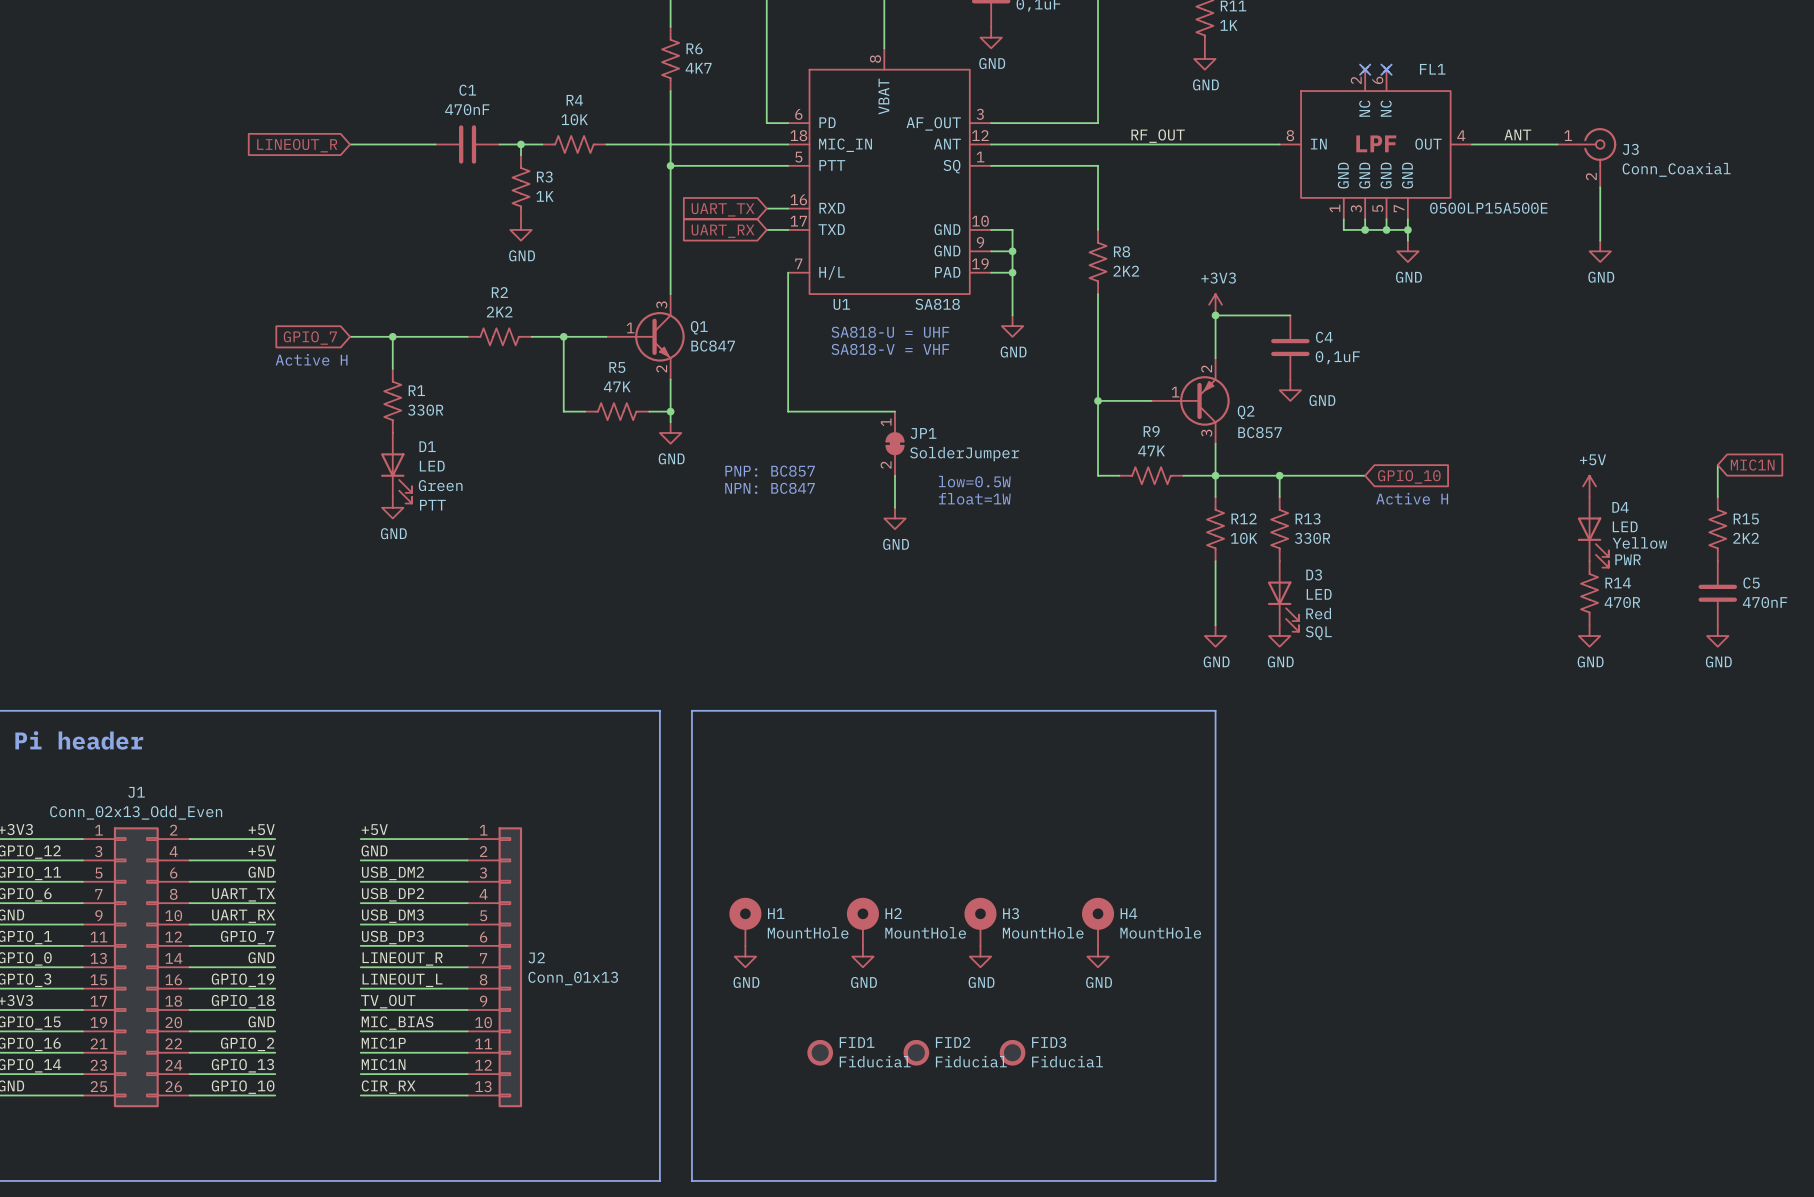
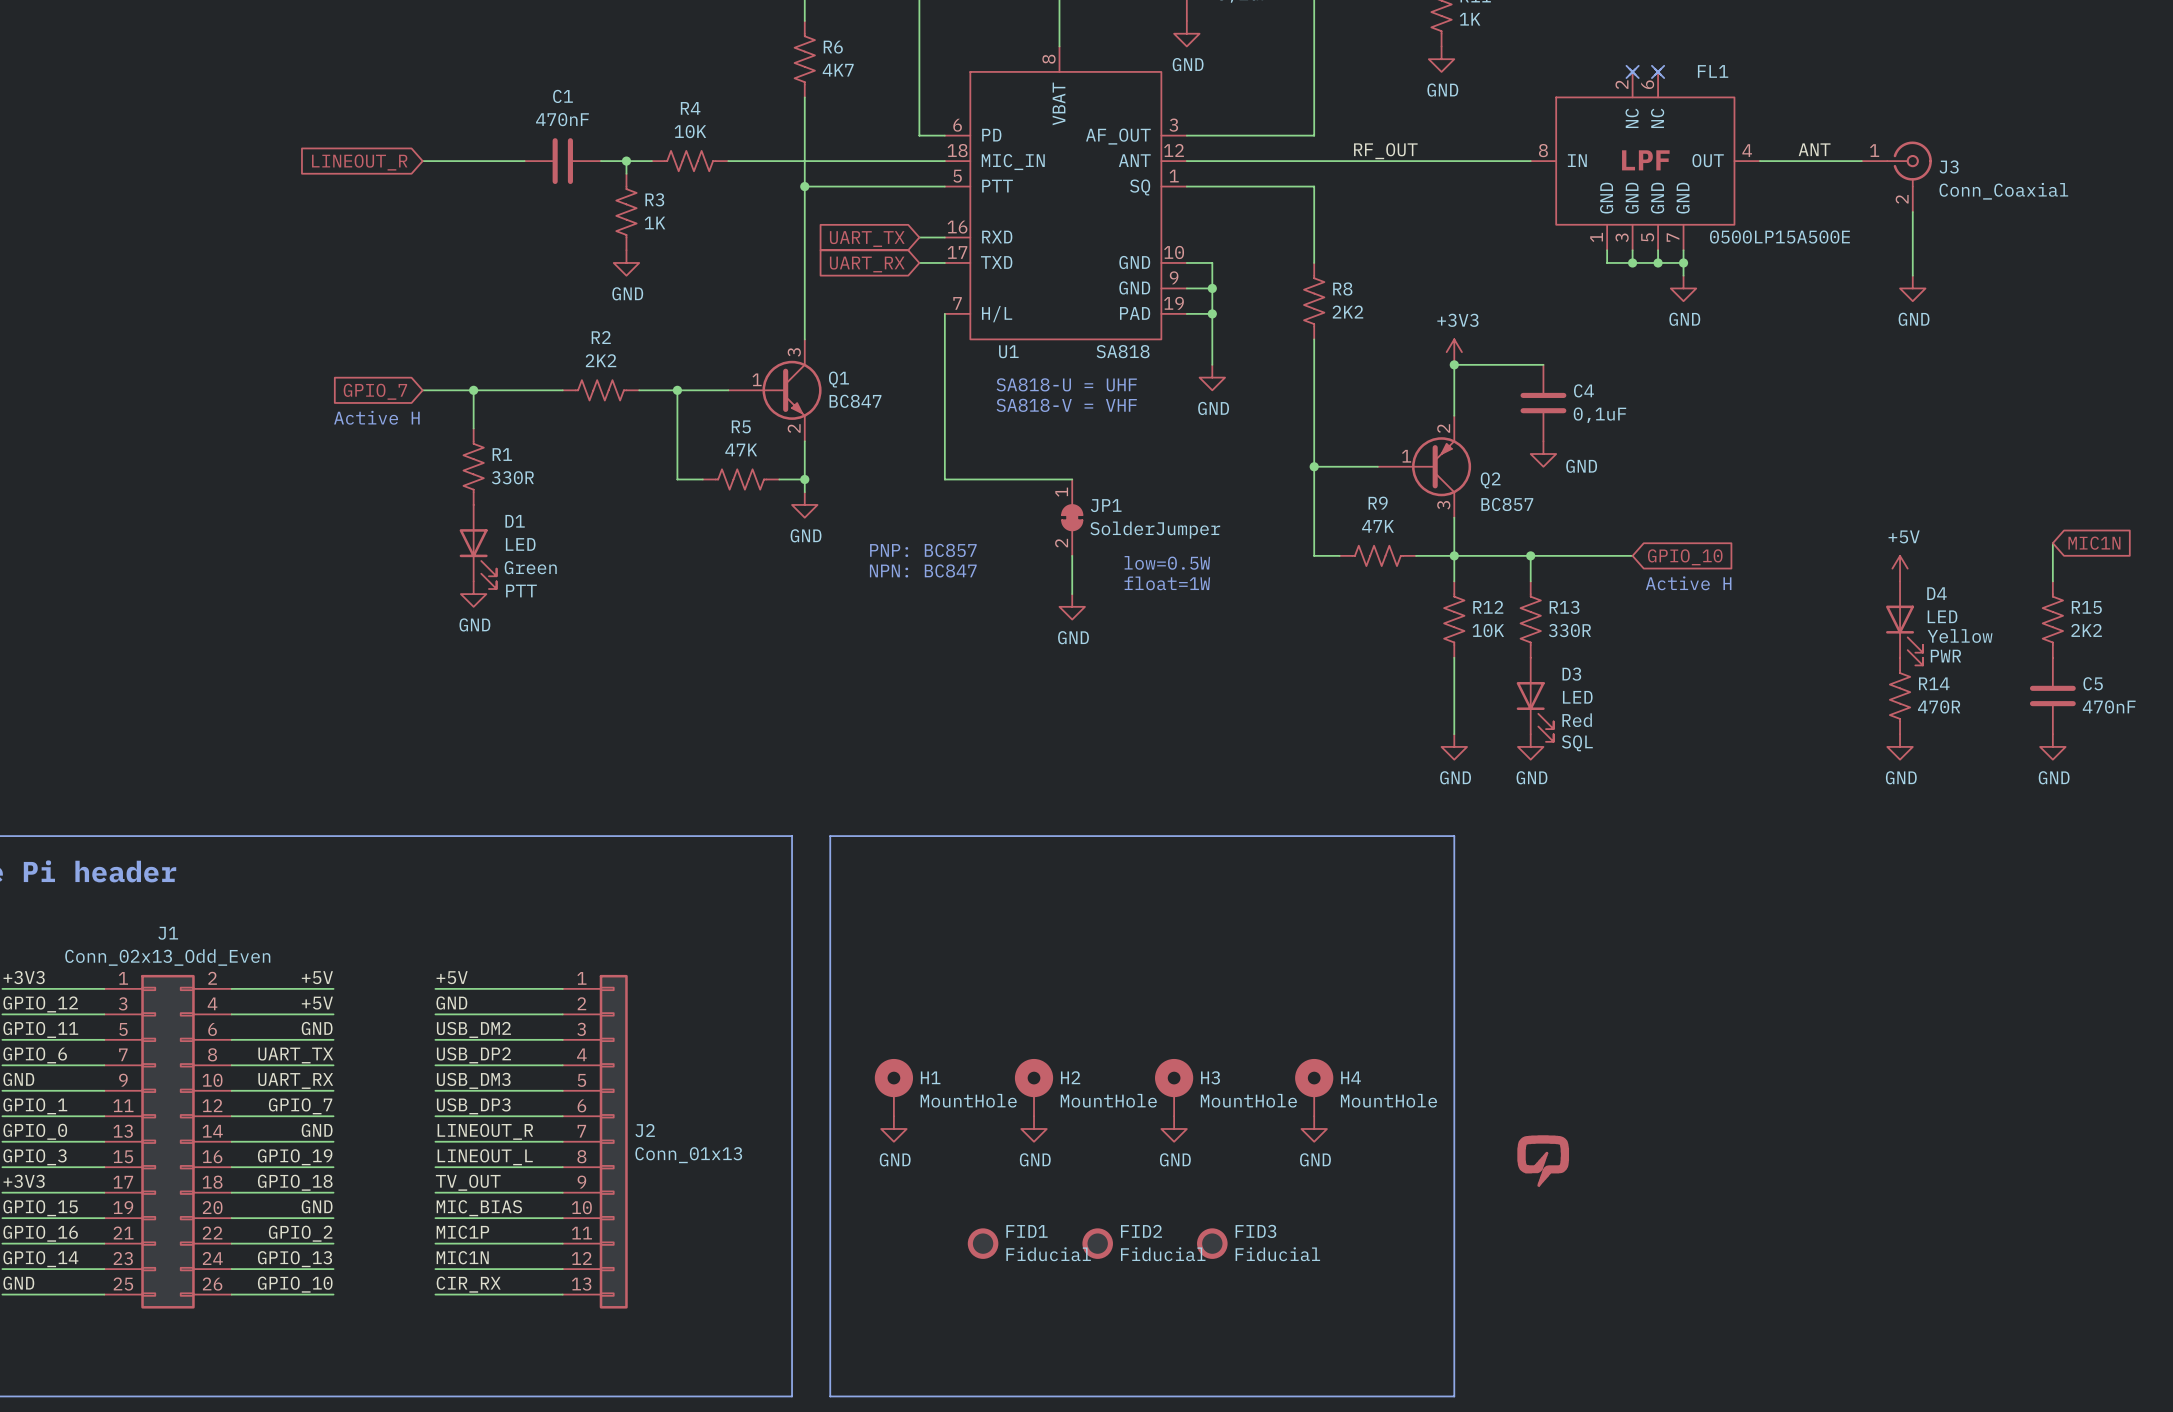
part: none -> (1543, 1160)

